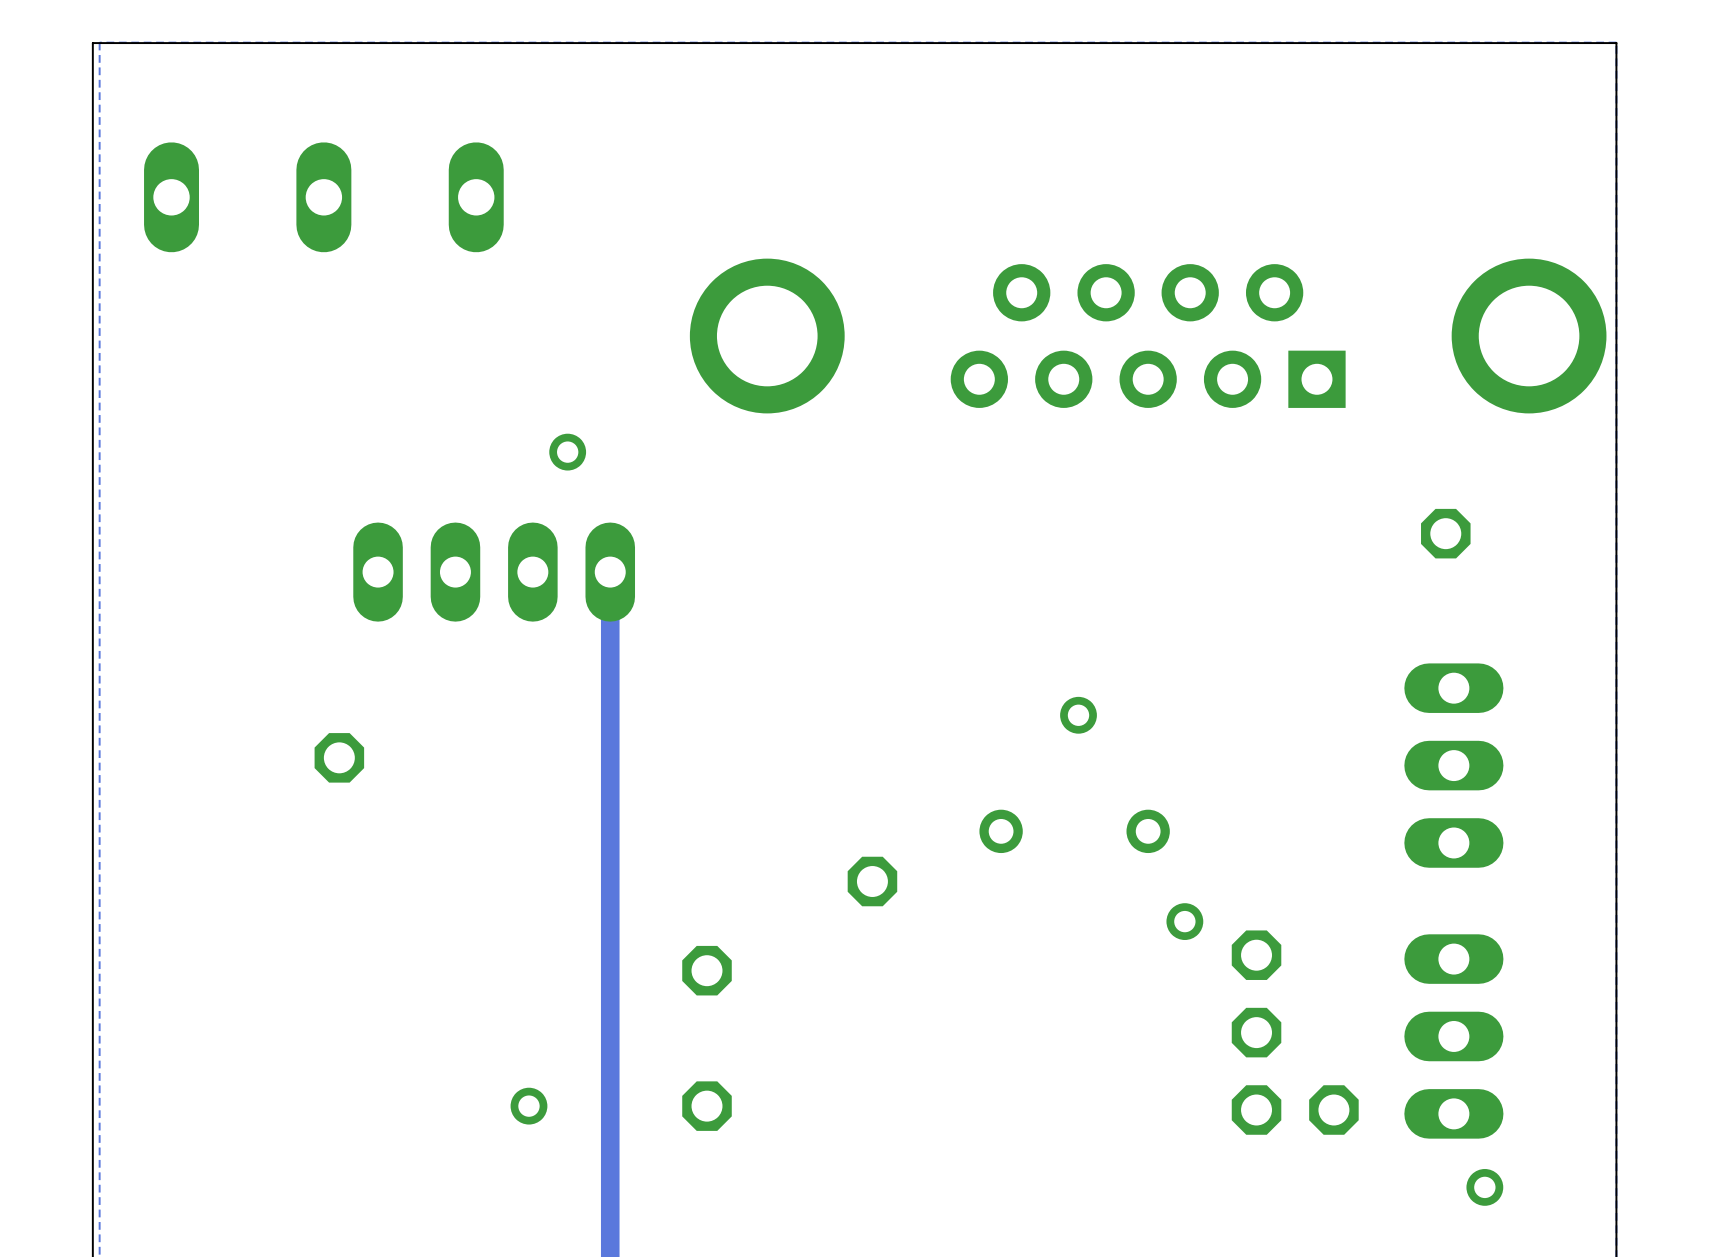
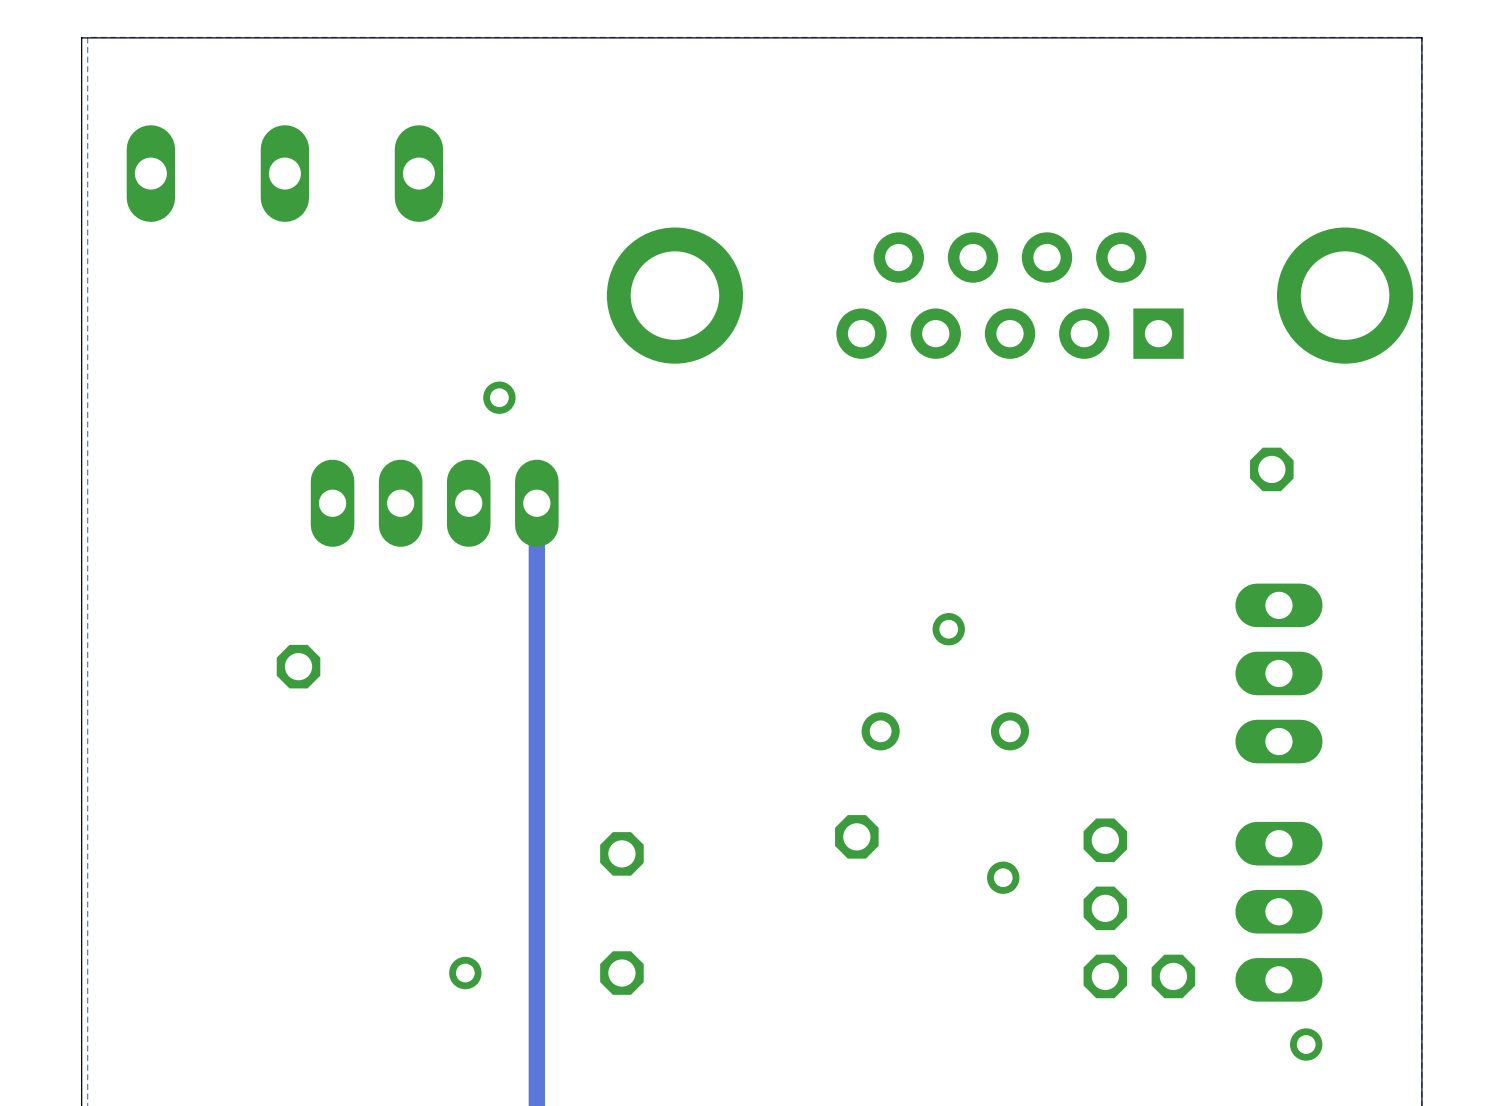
part position: (872, 881) -> (856, 836)
via position: (1184, 921) -> (1003, 877)

